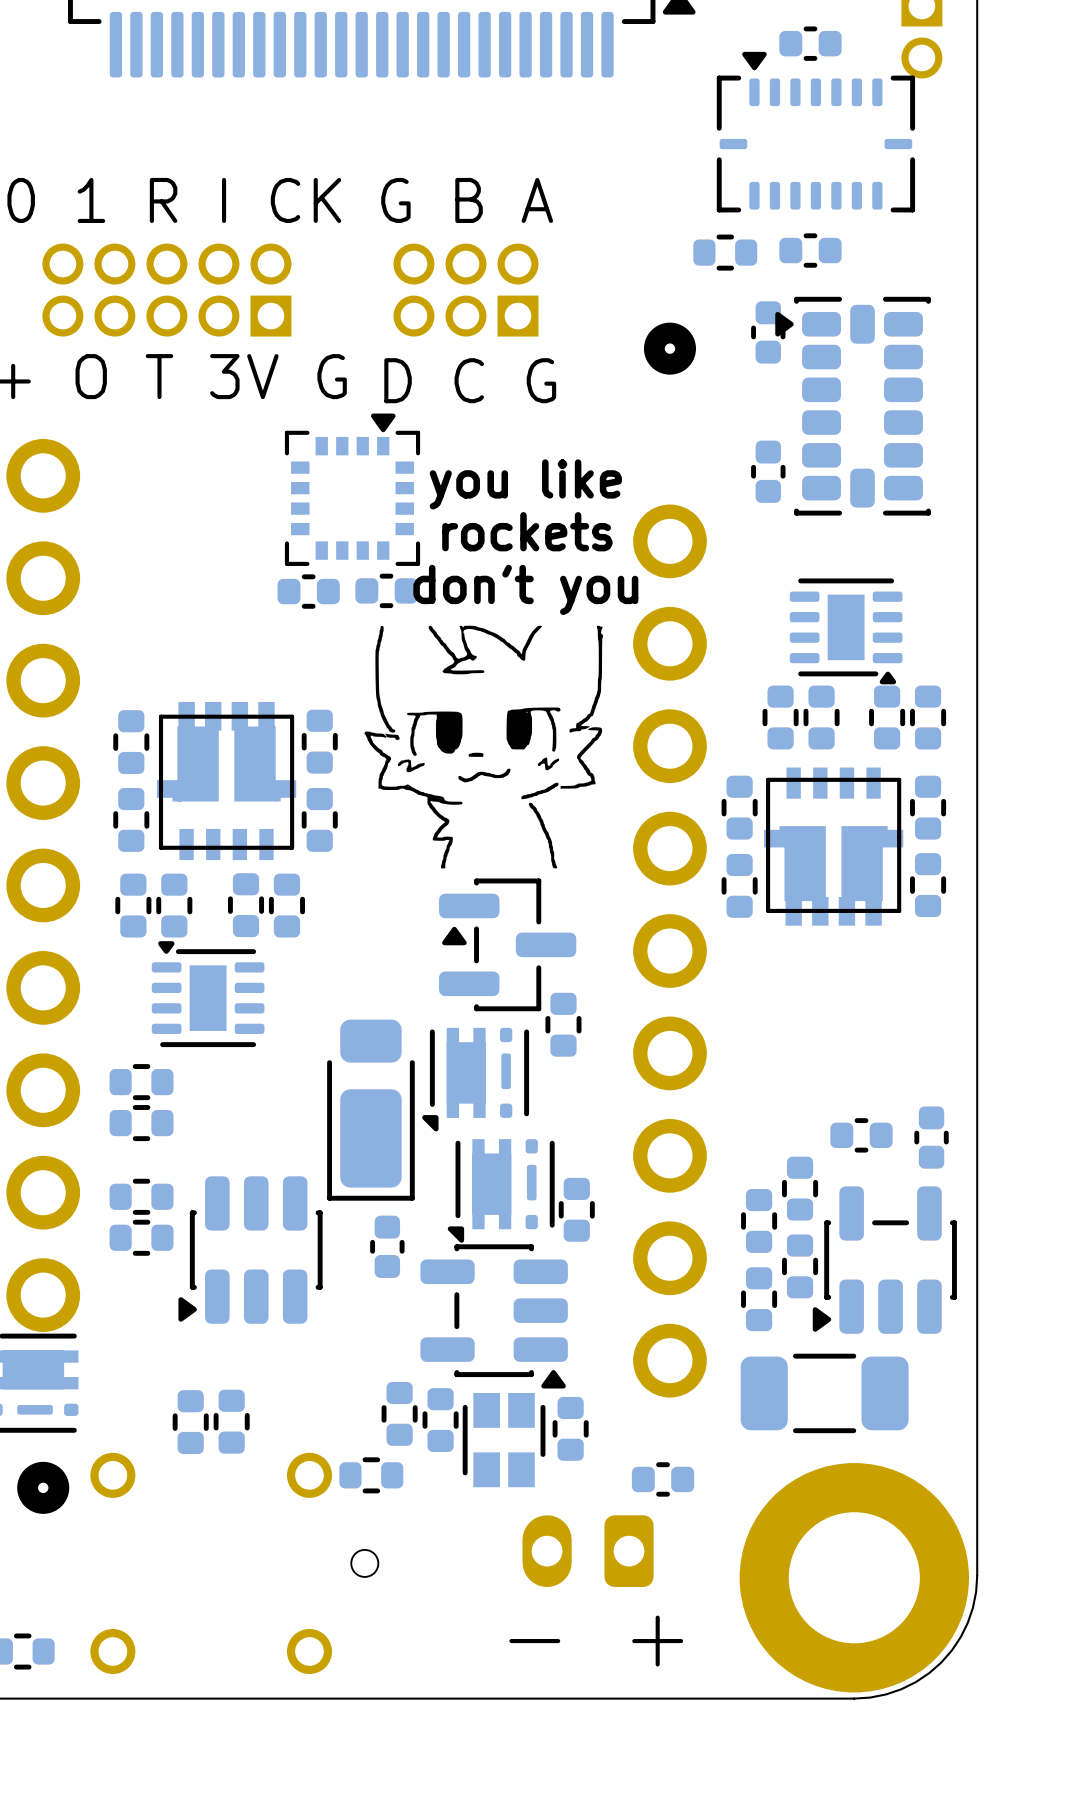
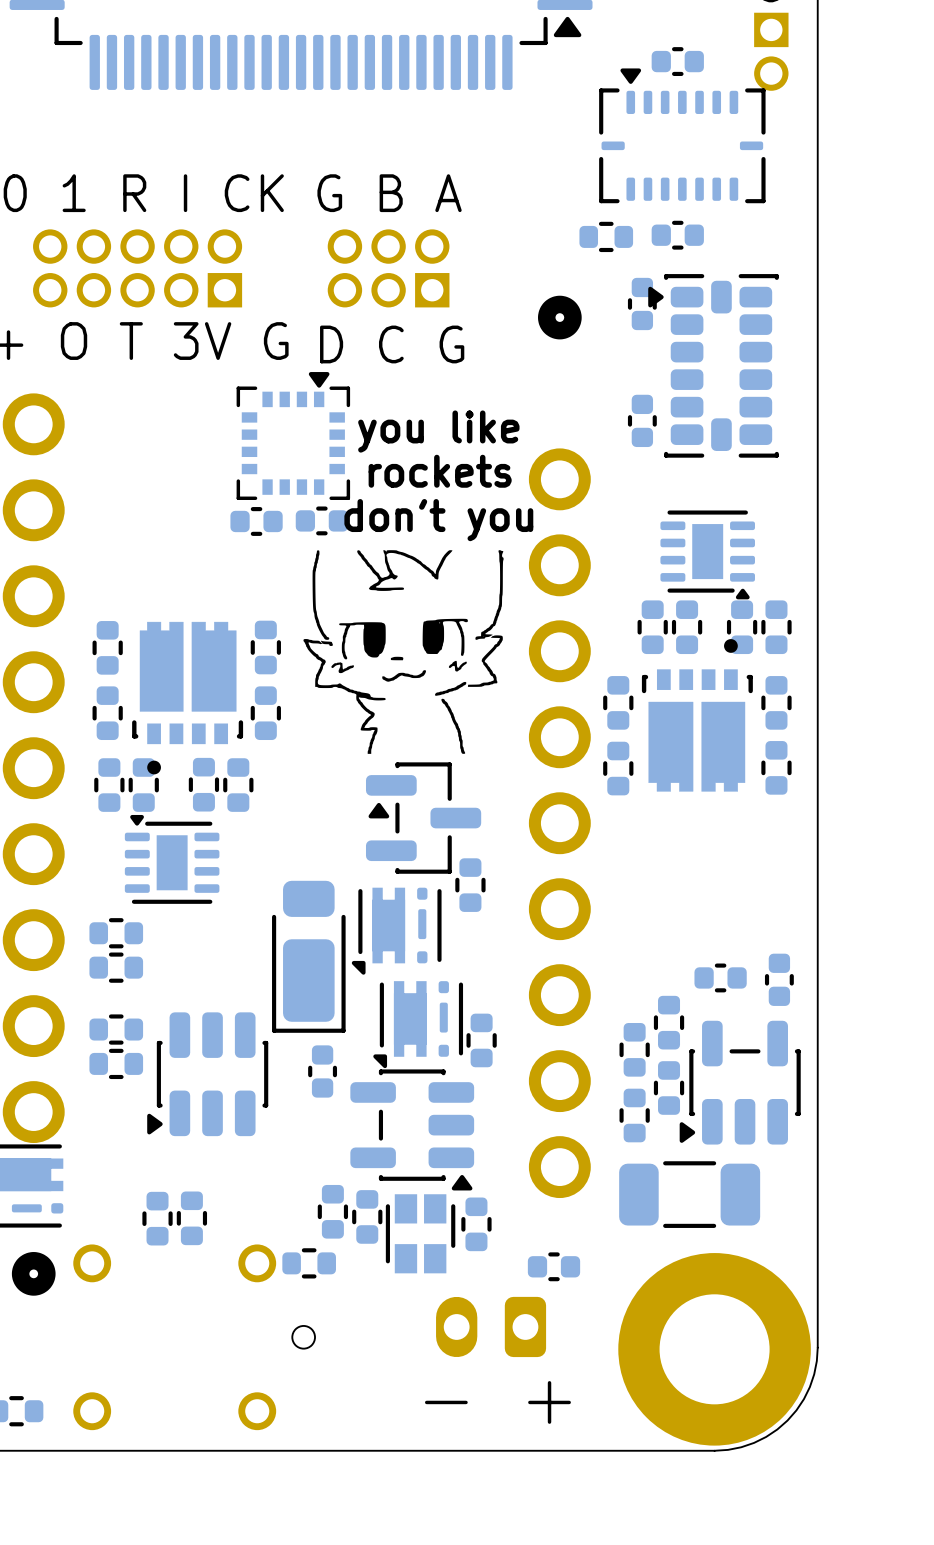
part footprint: [156, 701, 297, 861] -> [132, 621, 244, 775]
part footprint: [763, 767, 904, 926] -> [641, 639, 753, 792]

